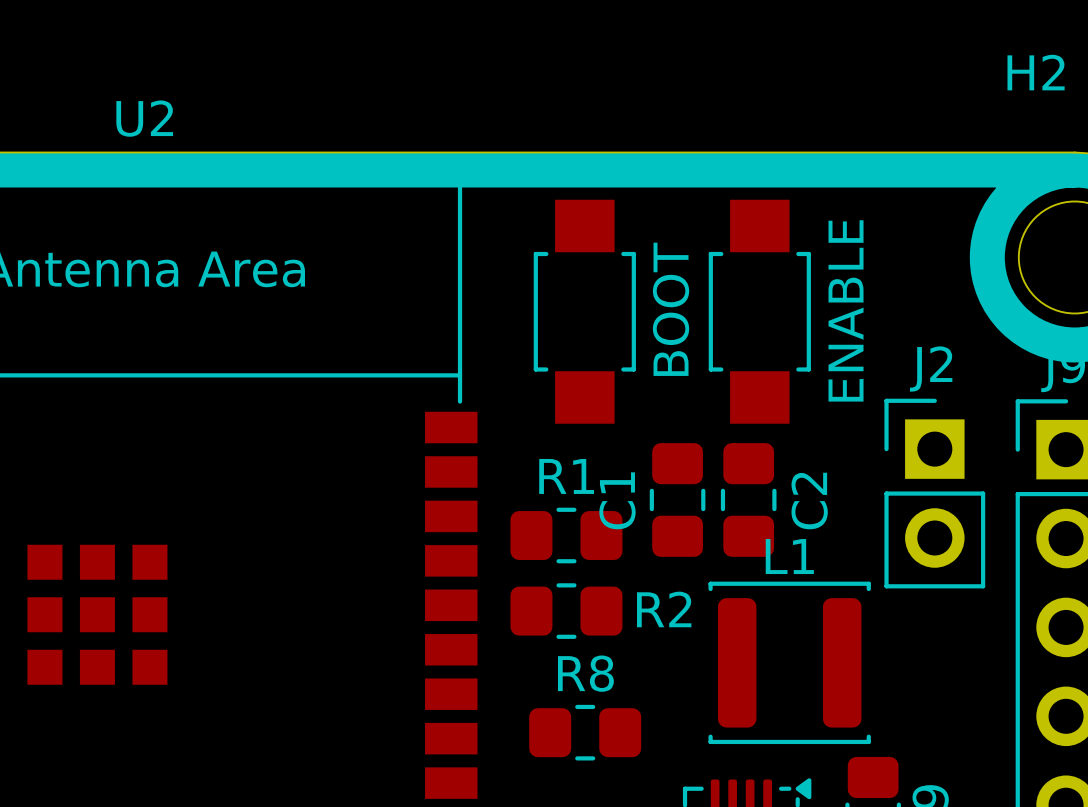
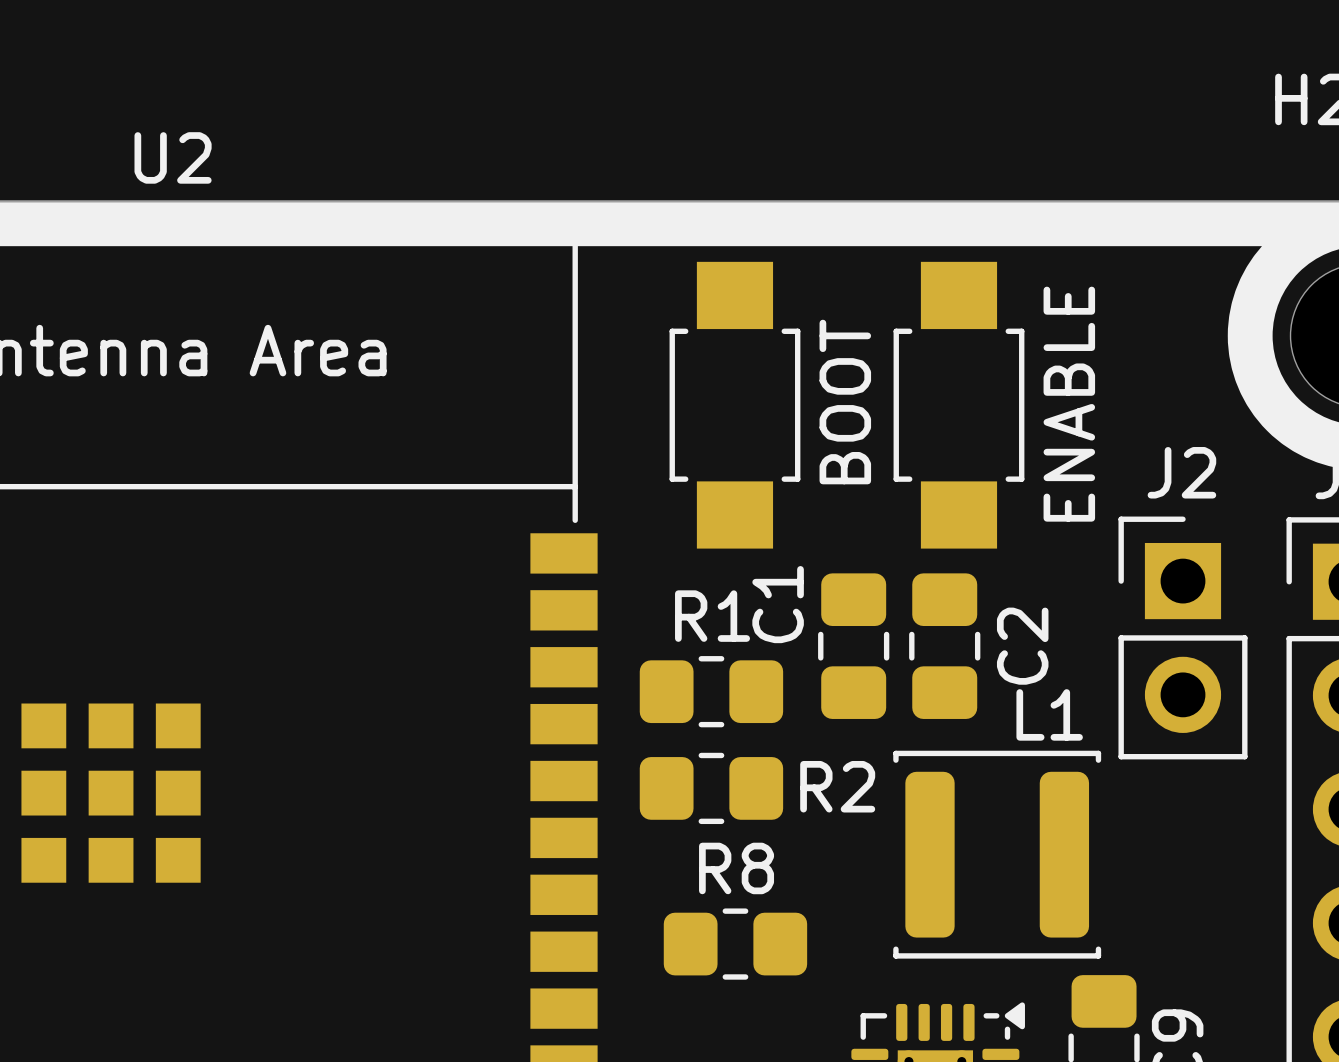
C1 name position: C1 (617, 500) -> C1 (778, 604)
L1 name position: L1 (789, 556) -> L1 (1049, 714)

